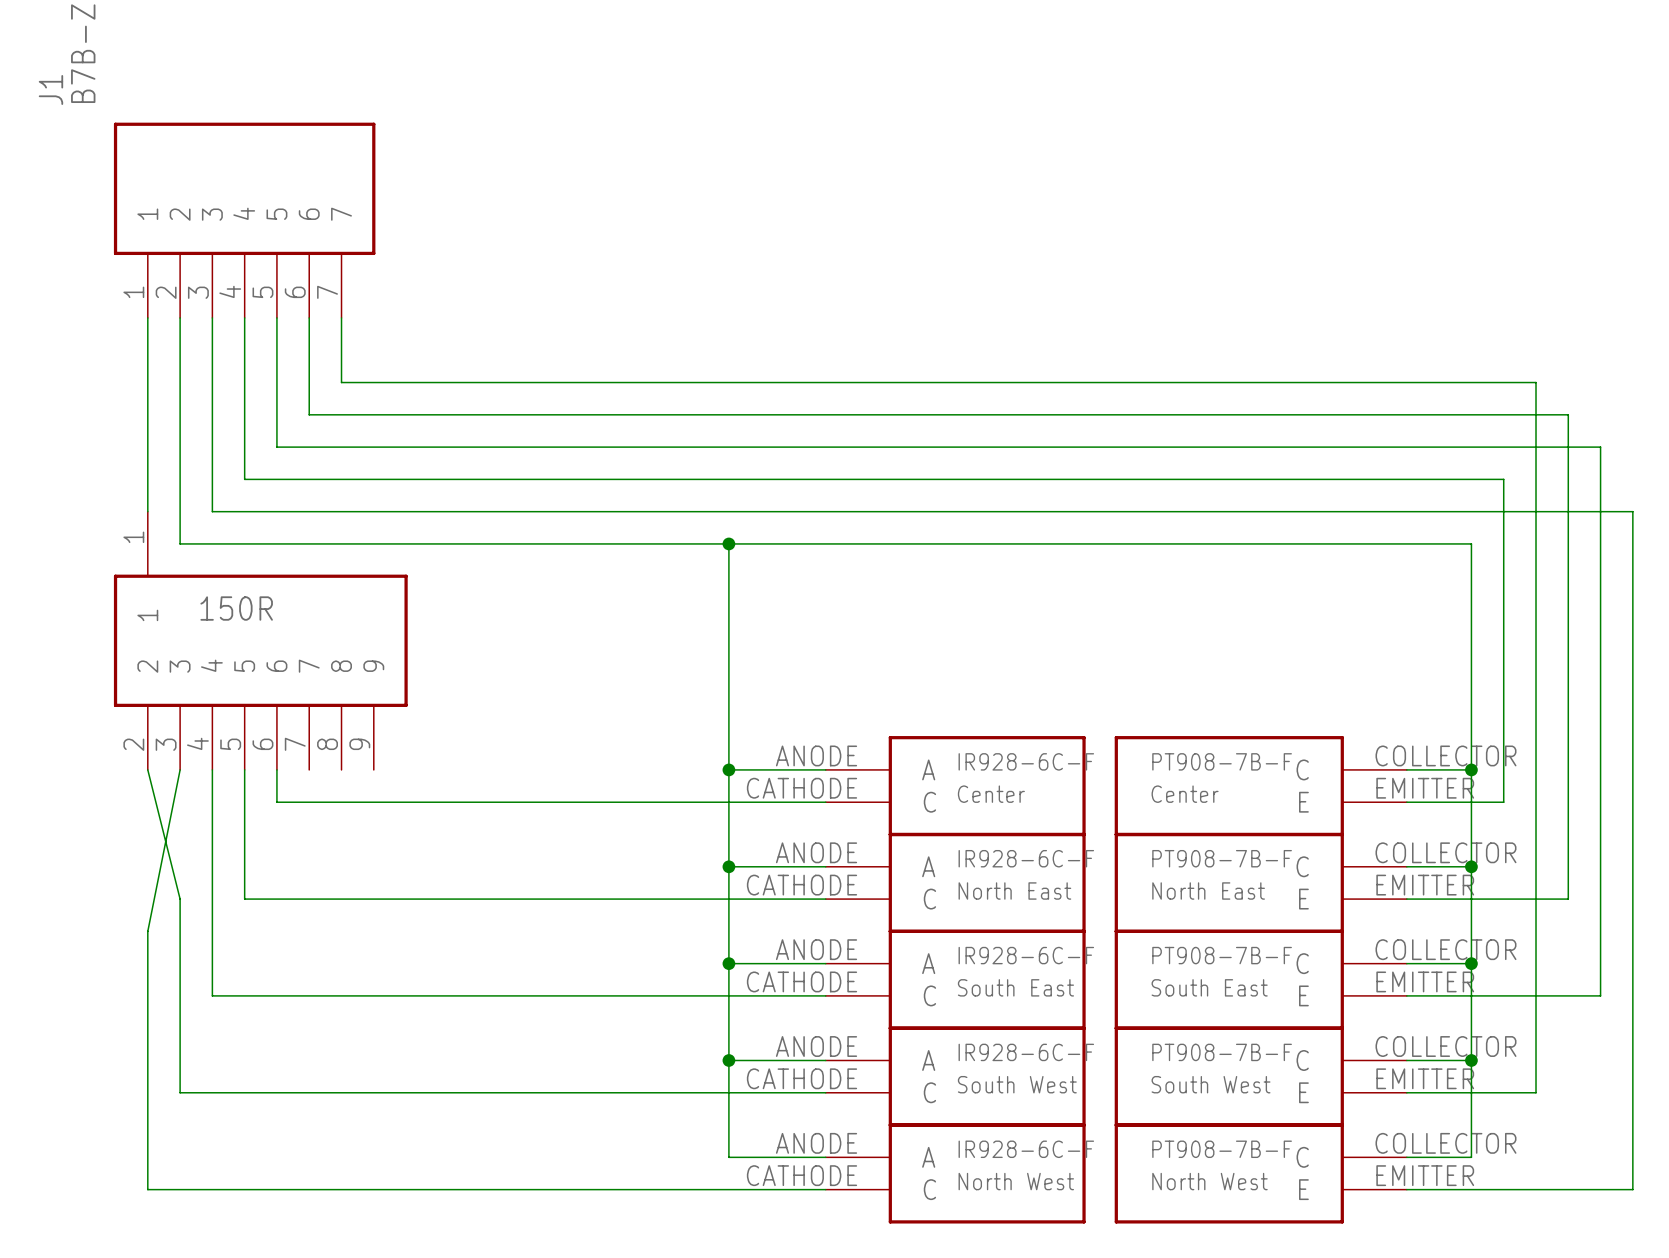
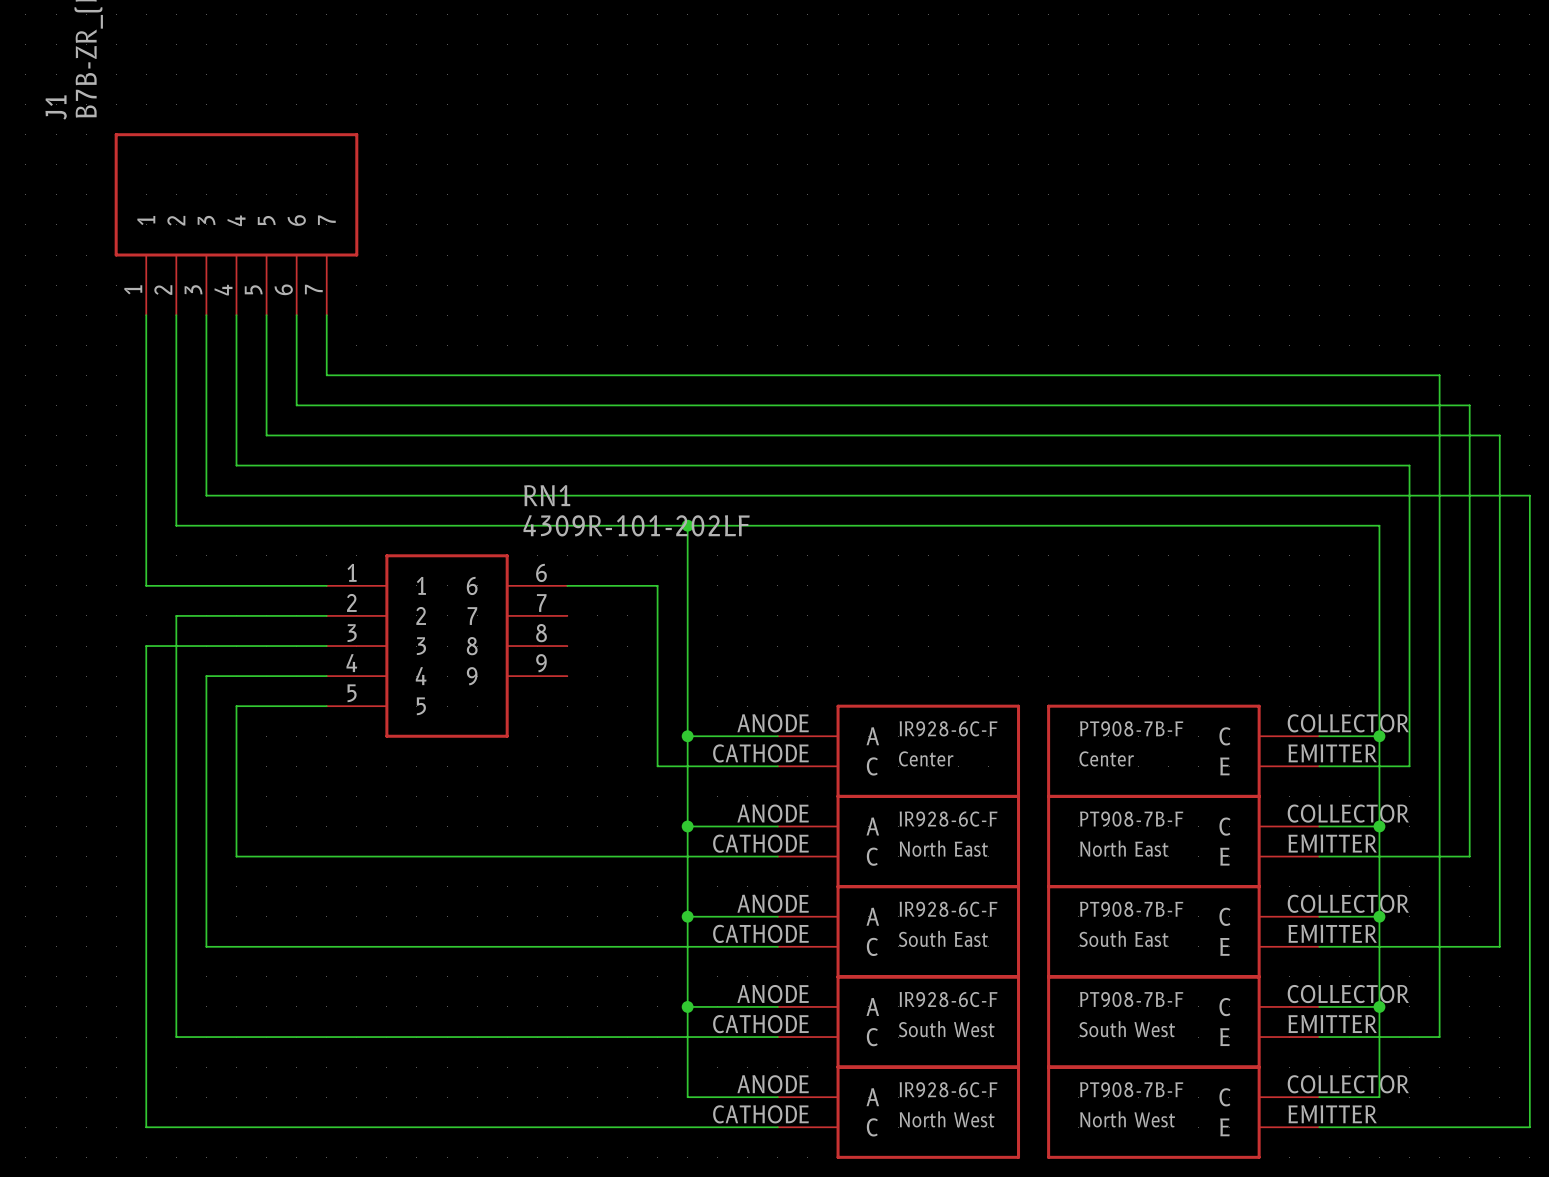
wire: none -> (146, 495) (146, 585) (326, 585)
part: 150R (260, 640) -> none
RN1: none -> 4309R-101-202LF (447, 646)
wire: none -> (326, 706) (236, 706) (236, 736)
wire: (147, 769) (180, 899) -> (326, 615) (176, 615) (176, 856)
wire: (180, 769) (147, 931) -> (326, 646) (146, 646) (146, 886)
wire: (276, 769) (276, 802) (696, 802) -> (567, 585) (657, 585) (657, 766)

